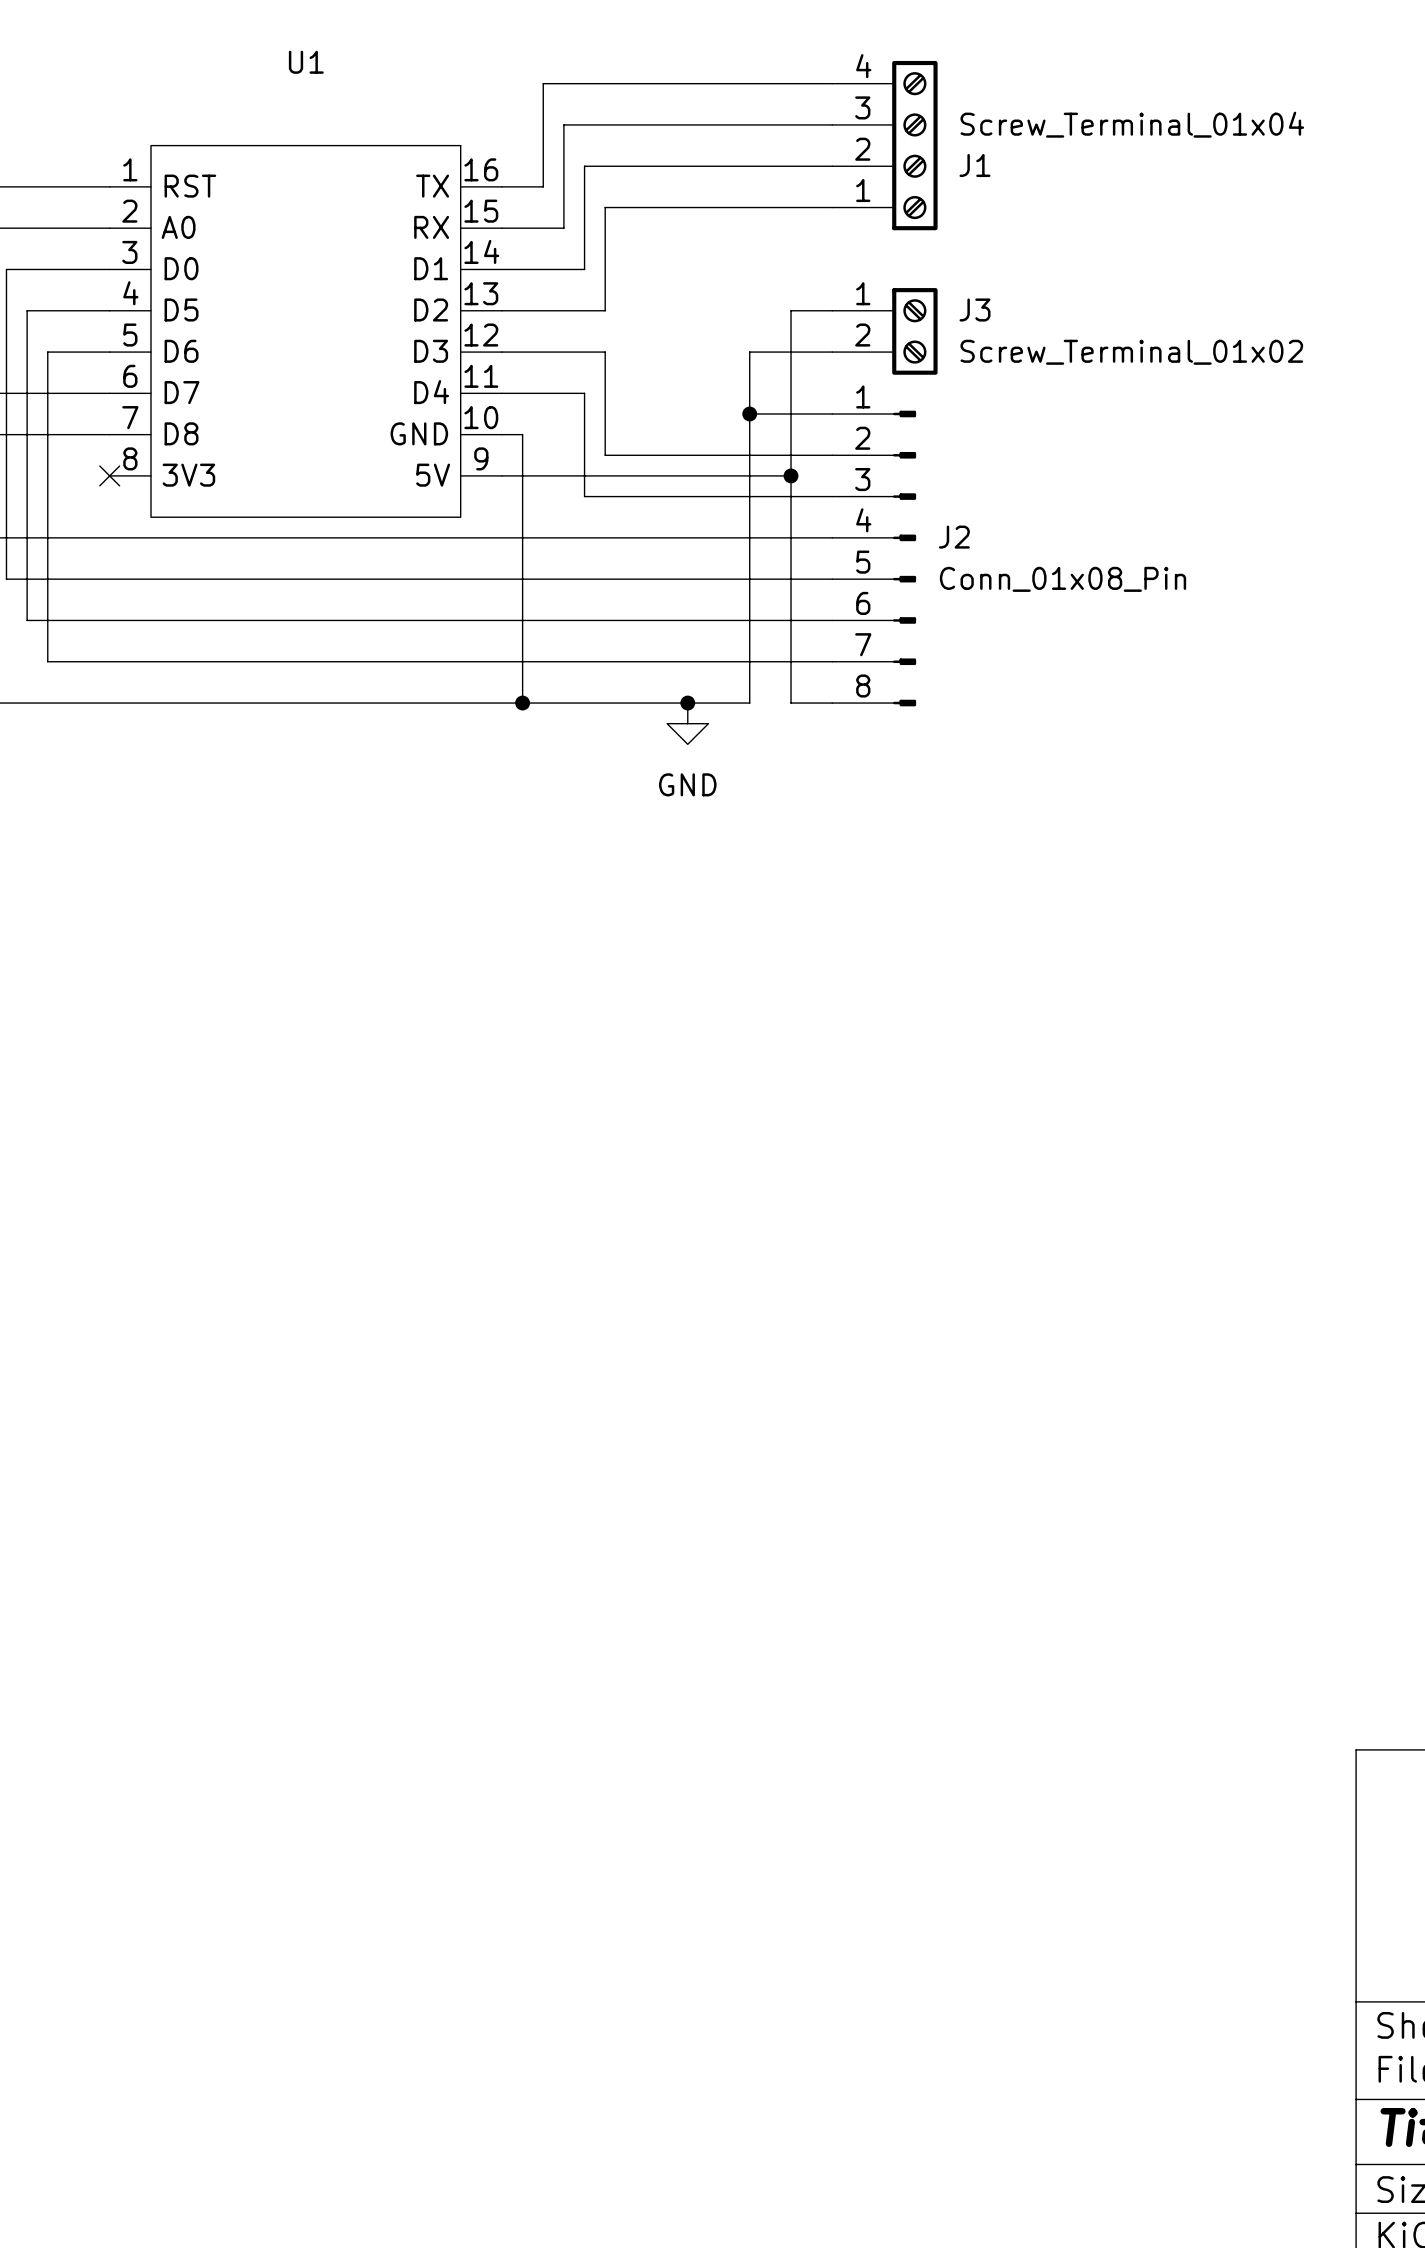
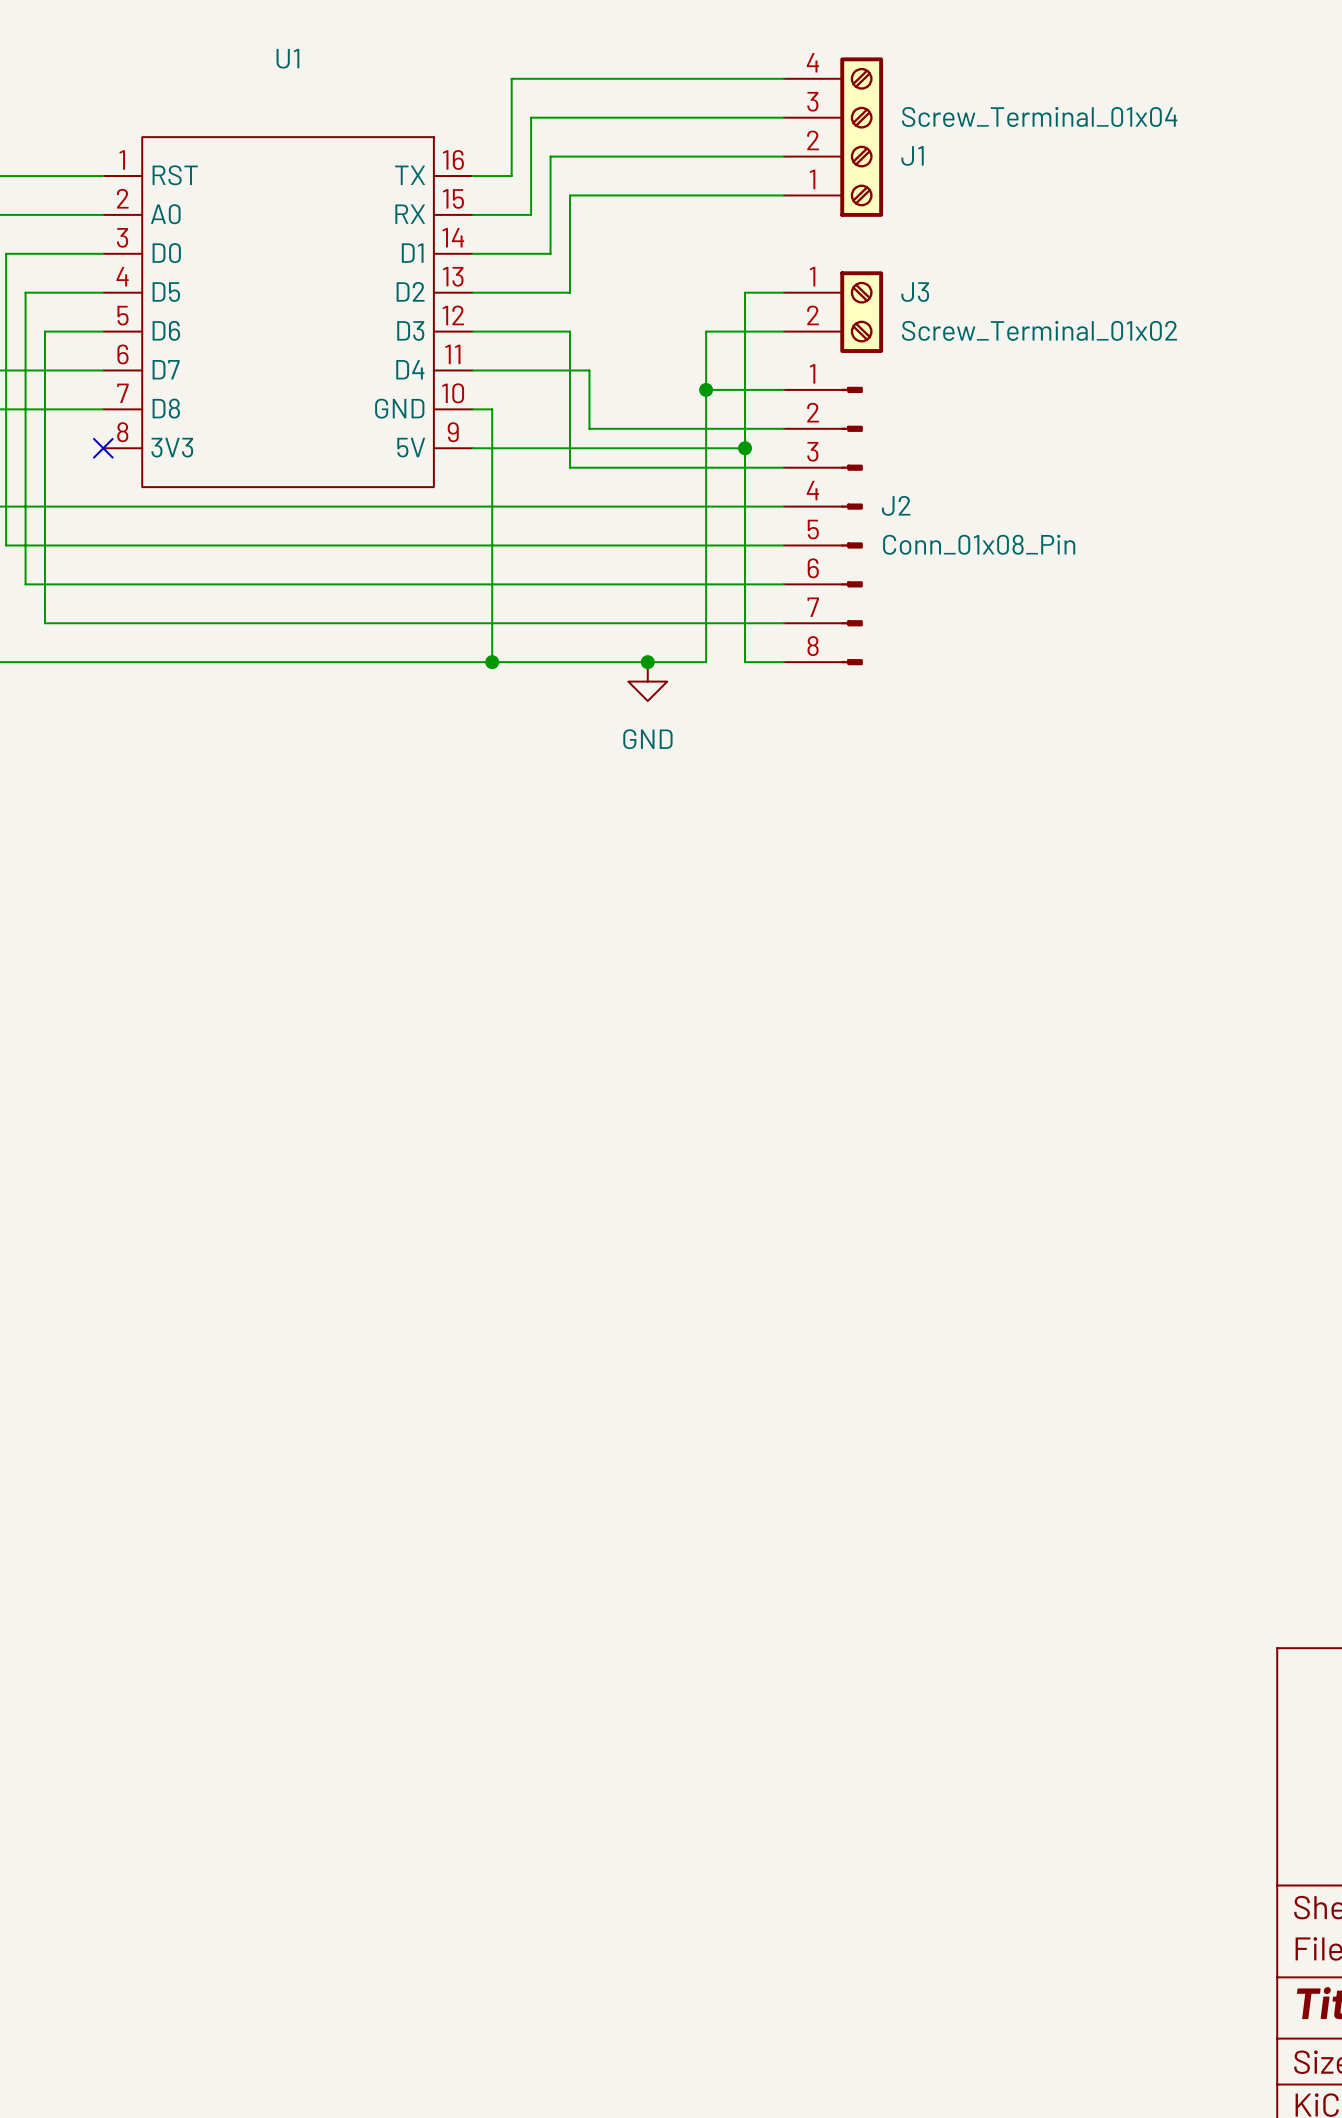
wire: (584, 393) (584, 496) (605, 496) -> (550, 370) (589, 370) (589, 428)
wire: (605, 455) (625, 455) -> (570, 428) (570, 467)

